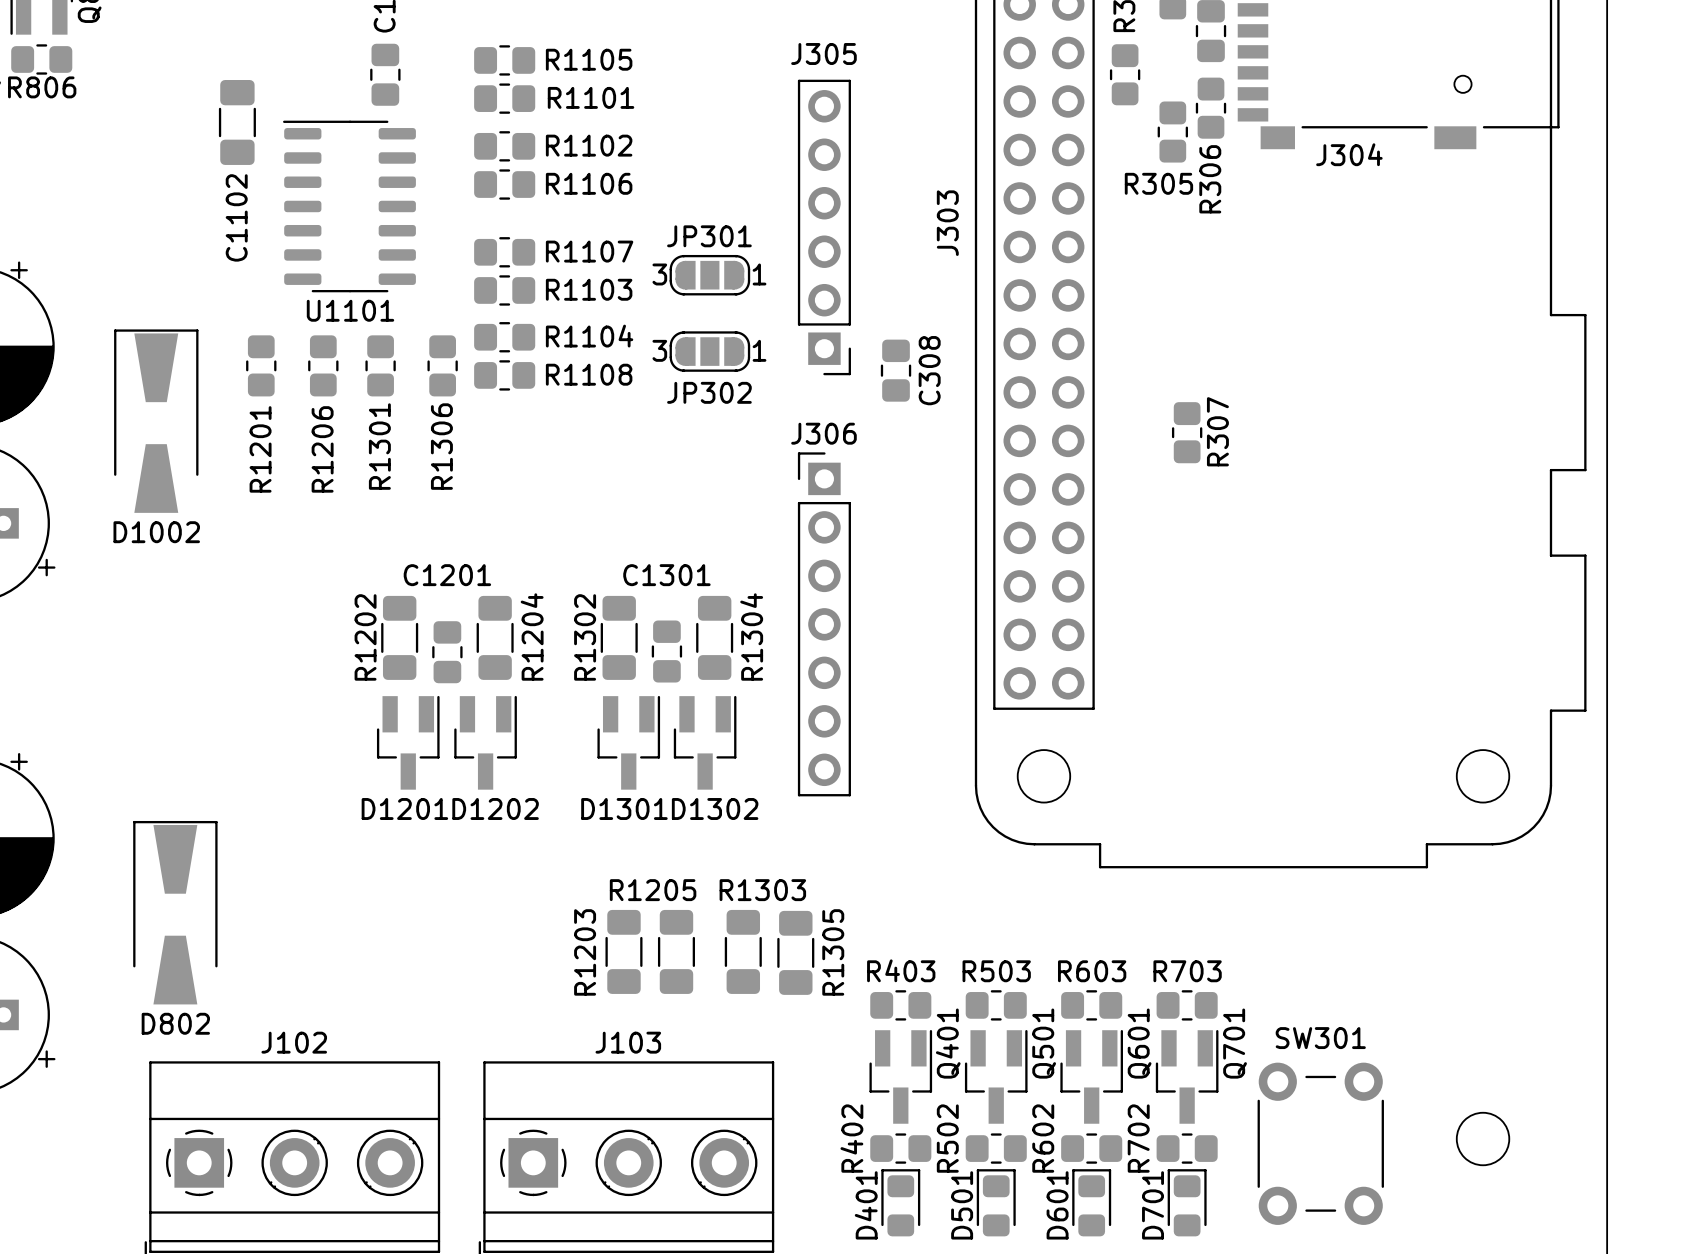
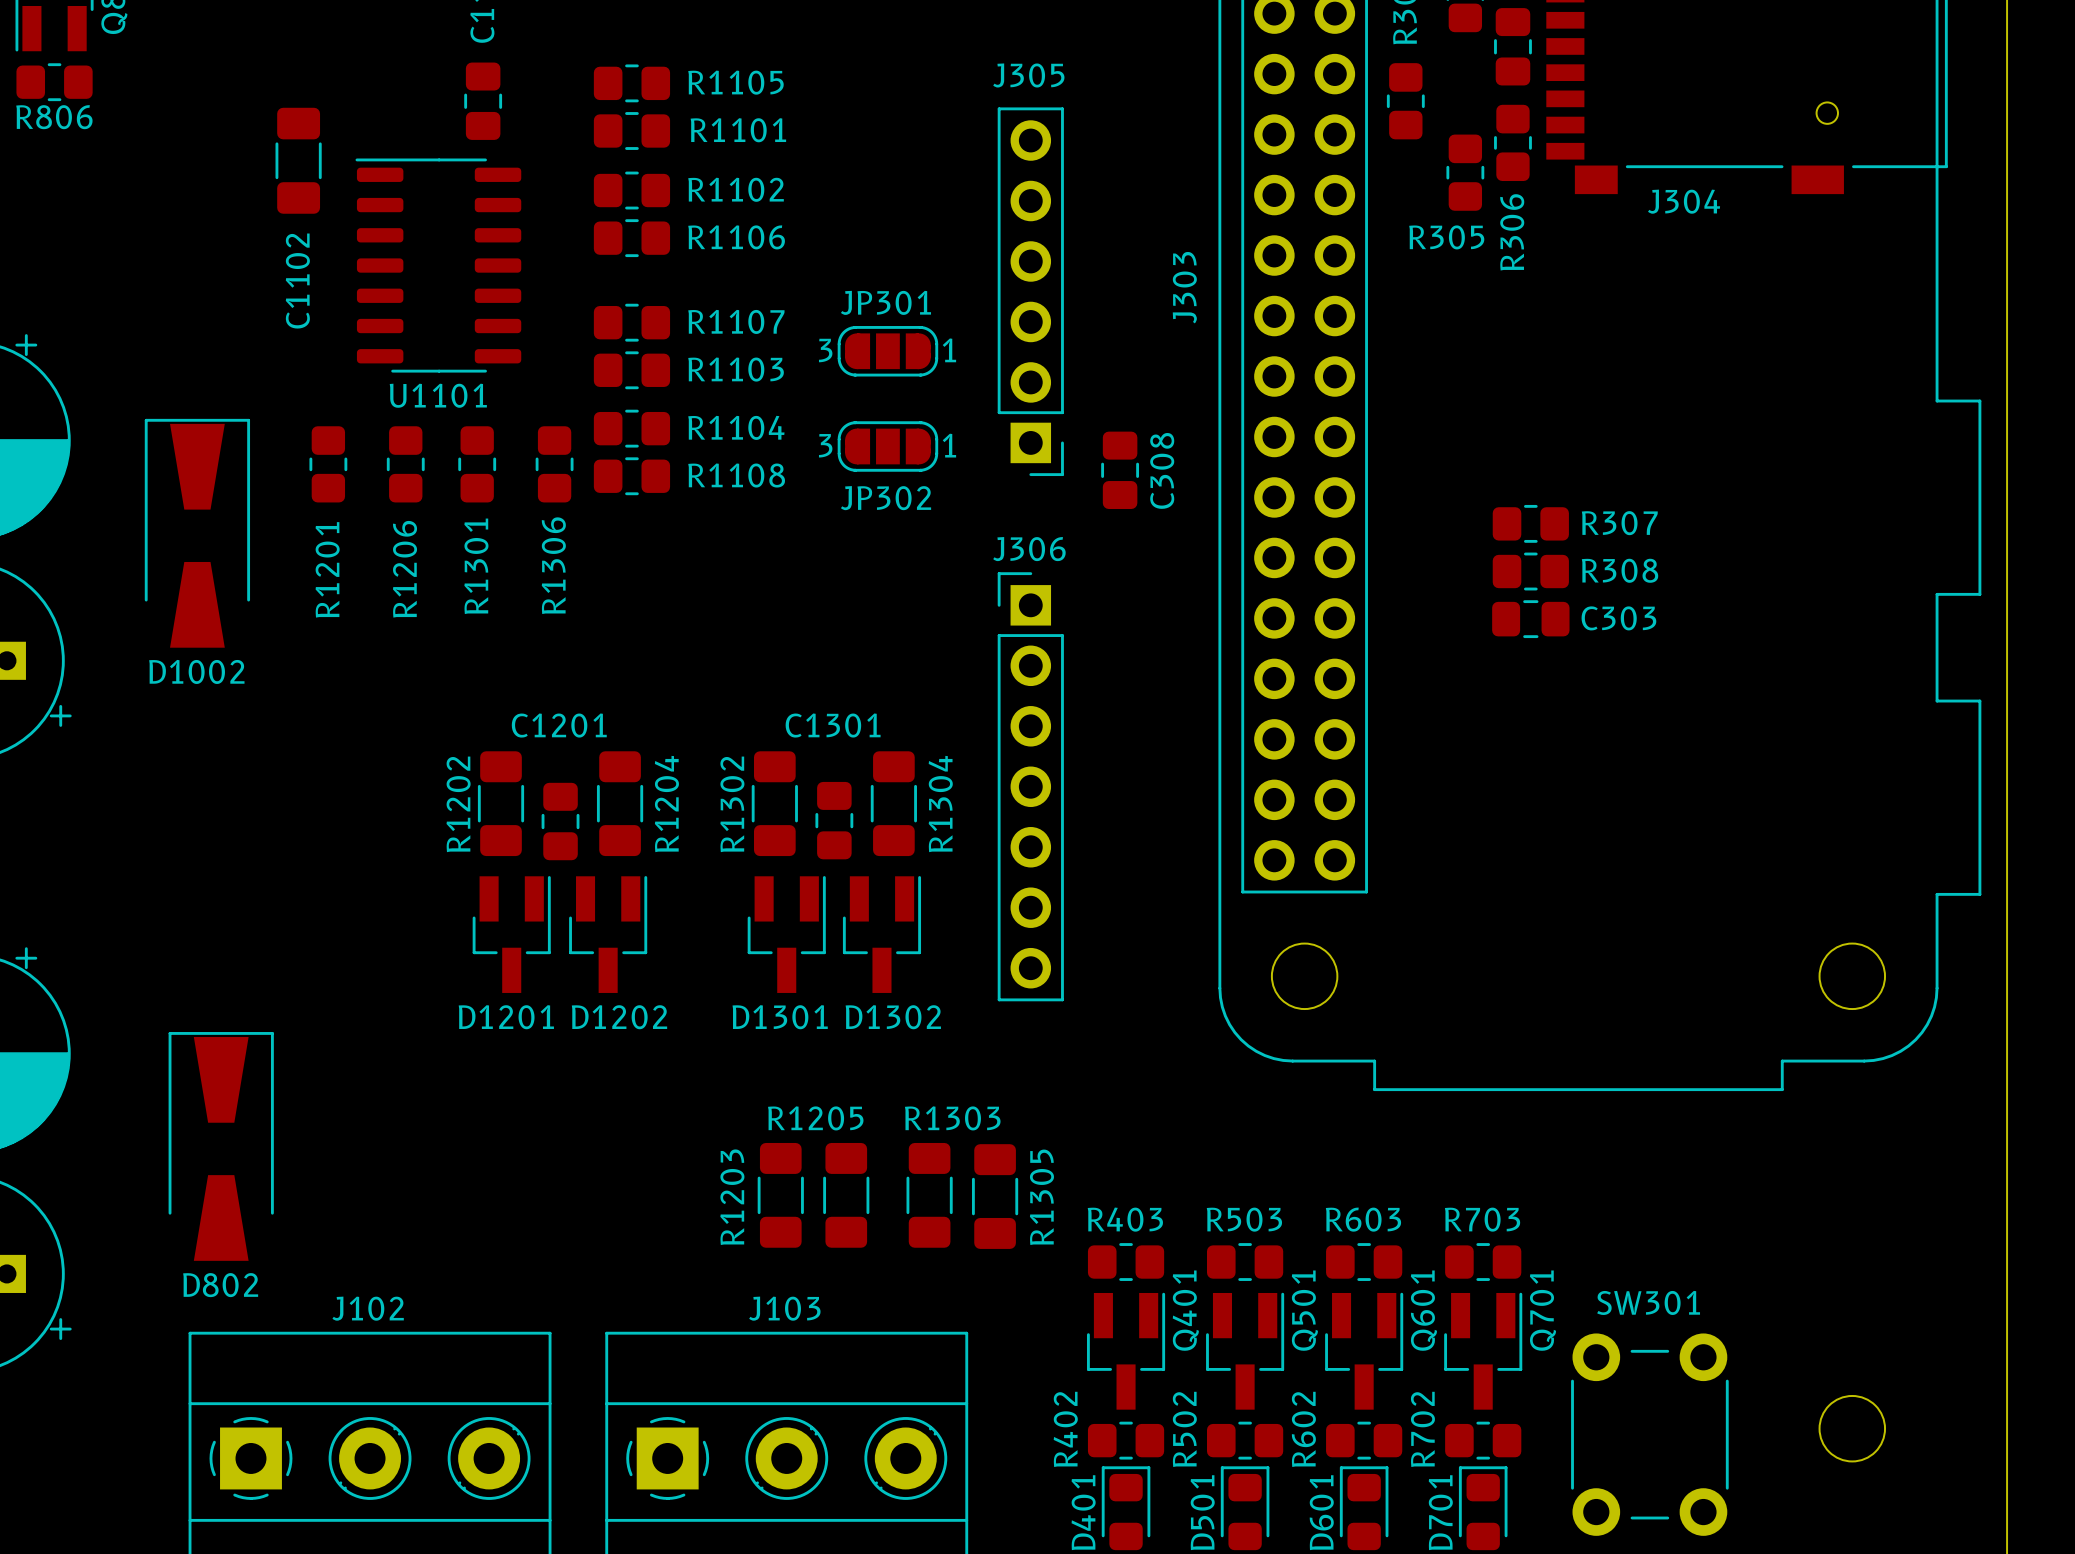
R307 name position: R307 (1217, 431) -> R307 (1619, 523)
R307 rotation: 0° (1187, 432) -> 90° clockwise (1530, 523)
R307 position: (1187, 432) -> (1530, 523)
R308: none -> (1530, 571)
C303: none -> (1530, 619)

